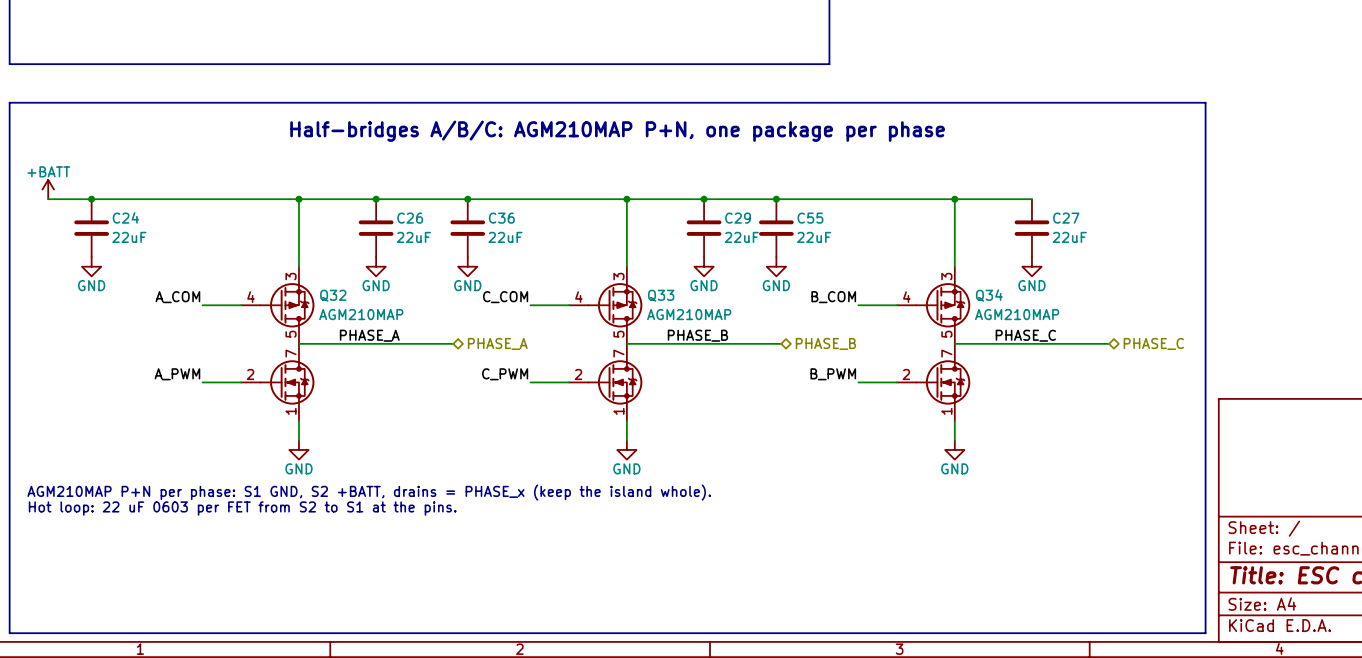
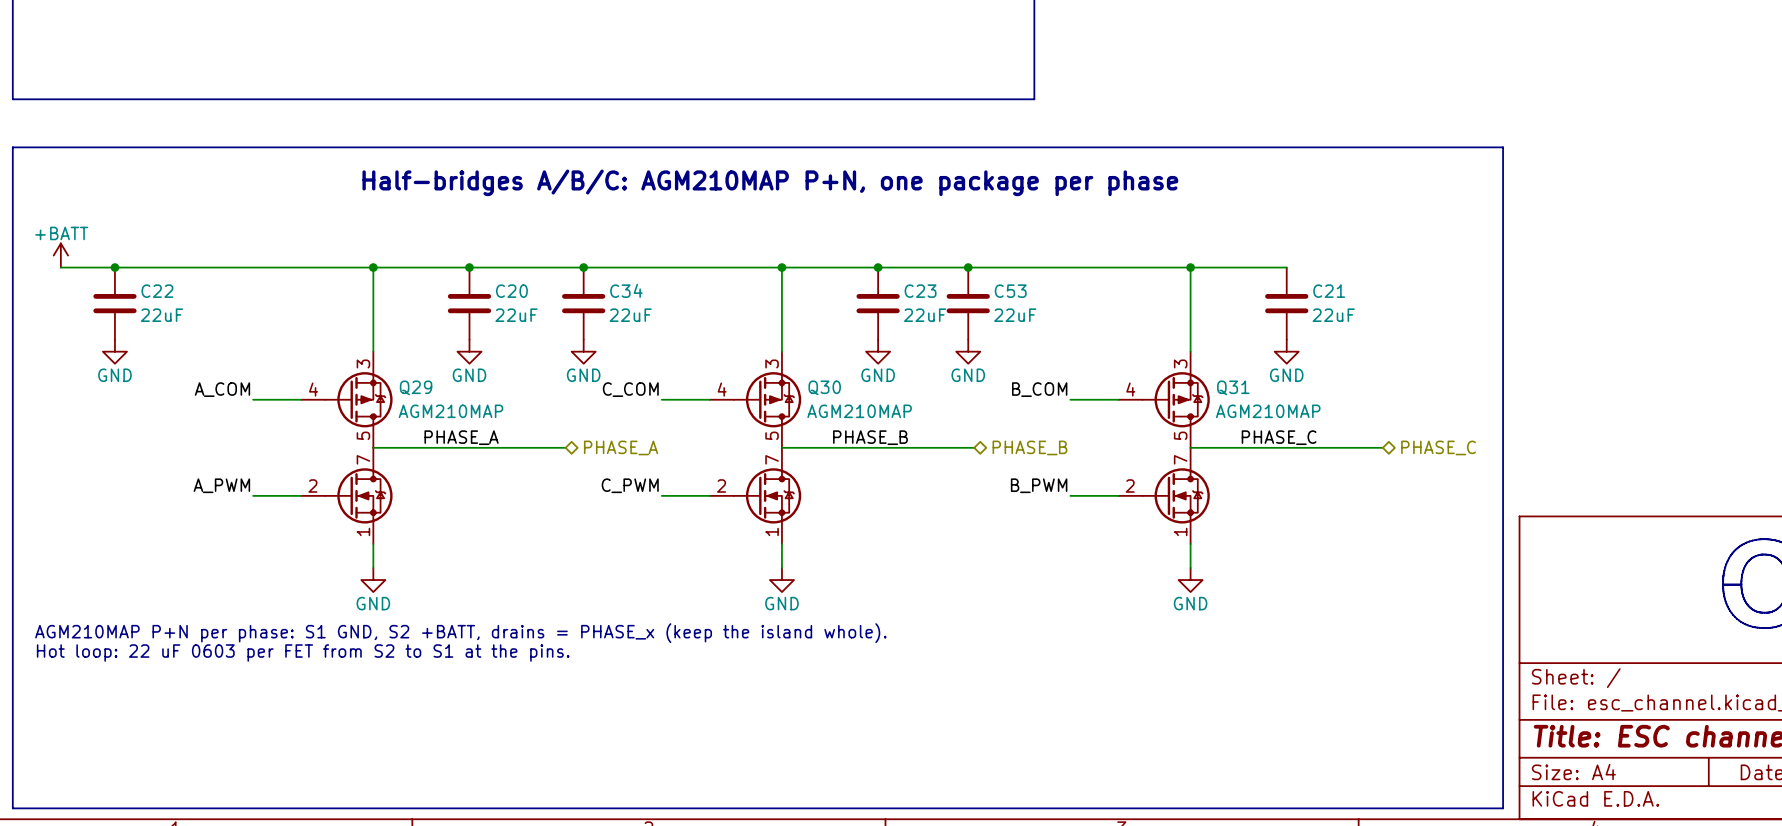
C24 name: C24 (125, 217) -> C22 (157, 291)
C26 name: C26 (410, 218) -> C20 (511, 291)
C36 name: C36 (501, 218) -> C34 (626, 290)
C29 name: C29 (738, 218) -> C23 (920, 291)
C55 name: C55 (810, 218) -> C53 (1010, 291)
C27 name: C27 (1066, 218) -> C21 (1329, 291)
Q32 name: Q32 (333, 295) -> Q29 (416, 387)
Q33 name: Q33 (661, 295) -> Q30 (824, 387)
Q34 name: Q34 (989, 295) -> Q31 (1233, 387)

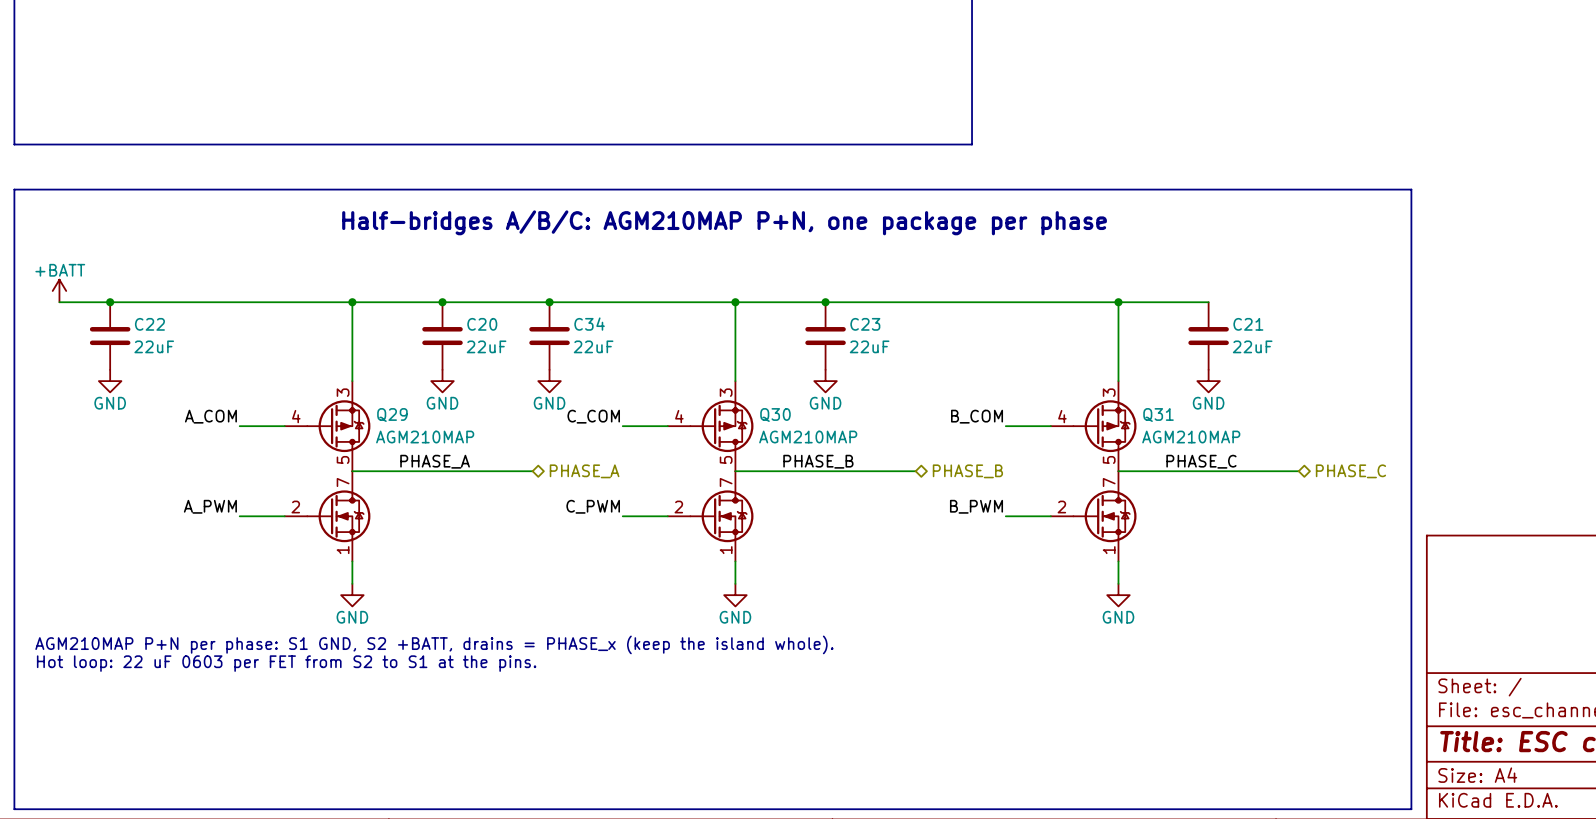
junction: (968, 267) -> none
C53: 22uF (968, 303) -> none
power symbol: GND (968, 351) -> none

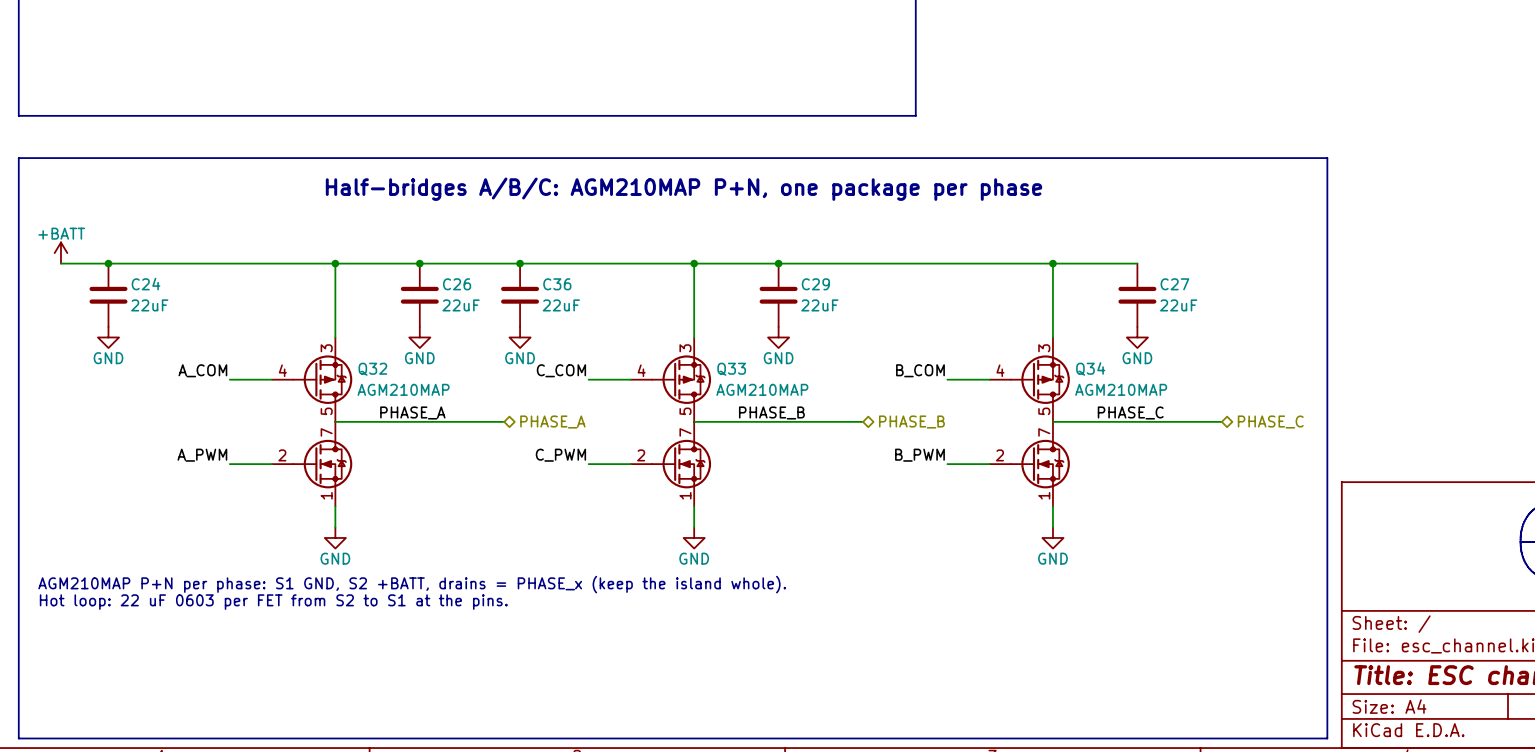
C22 name: C22 (149, 324) -> C24 (146, 284)
C20 name: C20 (482, 324) -> C26 (457, 284)
C34 name: C34 (589, 324) -> C36 (557, 284)
C23 name: C23 (865, 324) -> C29 (815, 284)
C21 name: C21 (1248, 324) -> C27 (1174, 284)
Q29 name: Q29 (392, 415) -> Q32 (372, 369)
Q30 name: Q30 (775, 415) -> Q33 (731, 369)
Q31 name: Q31 (1158, 415) -> Q34 (1090, 368)

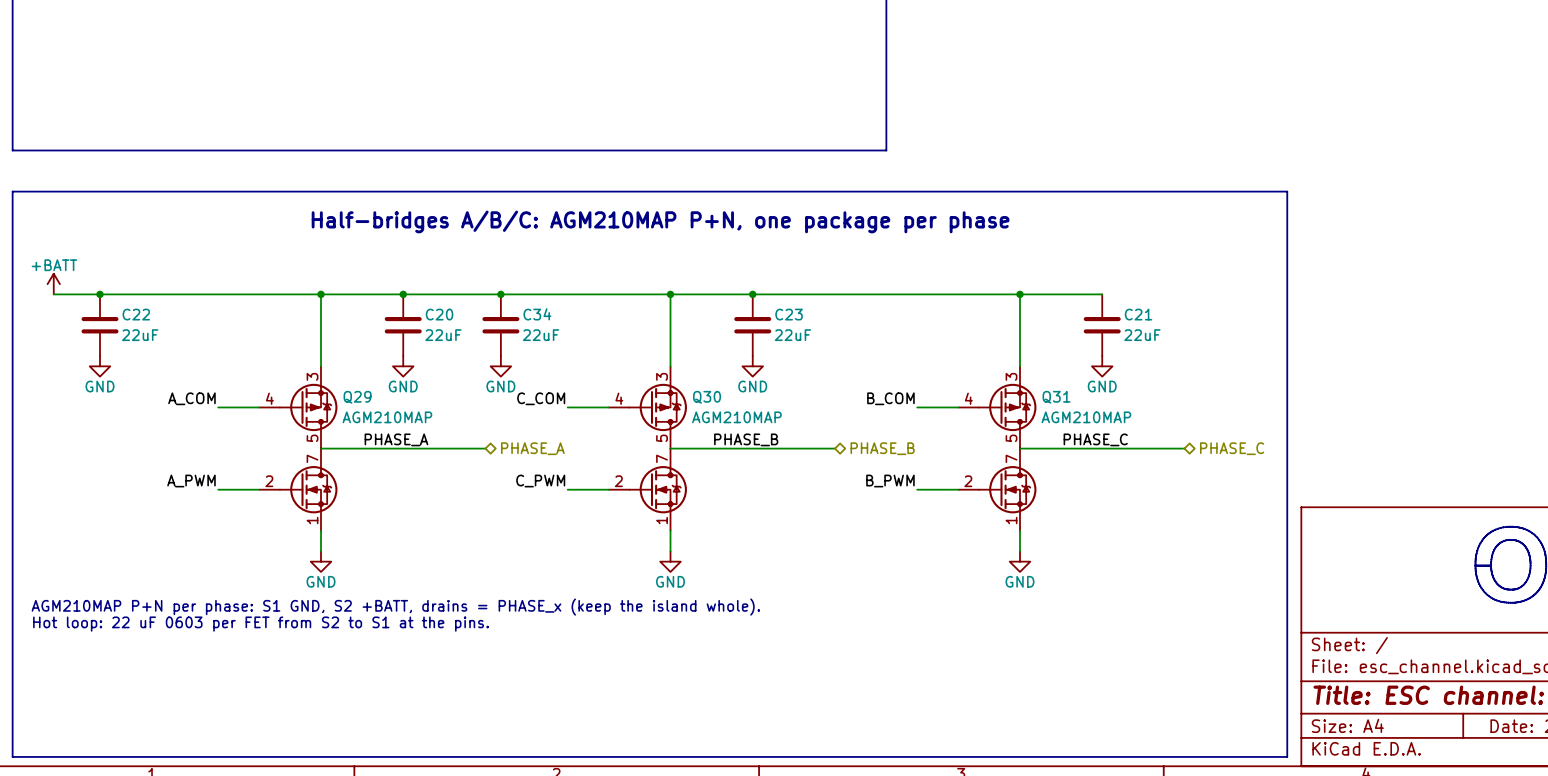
C24 name: C24 (146, 284) -> C22 (136, 314)
C26 name: C26 (457, 284) -> C20 (439, 314)
C36 name: C36 (557, 284) -> C34 (537, 314)
C29 name: C29 (815, 284) -> C23 (789, 314)
C27 name: C27 (1174, 284) -> C21 (1138, 314)
Q34 name: Q34 (1090, 368) -> Q31 (1056, 397)
Q32 name: Q32 (372, 369) -> Q29 (357, 397)
Q33 name: Q33 (731, 369) -> Q30 (707, 397)

